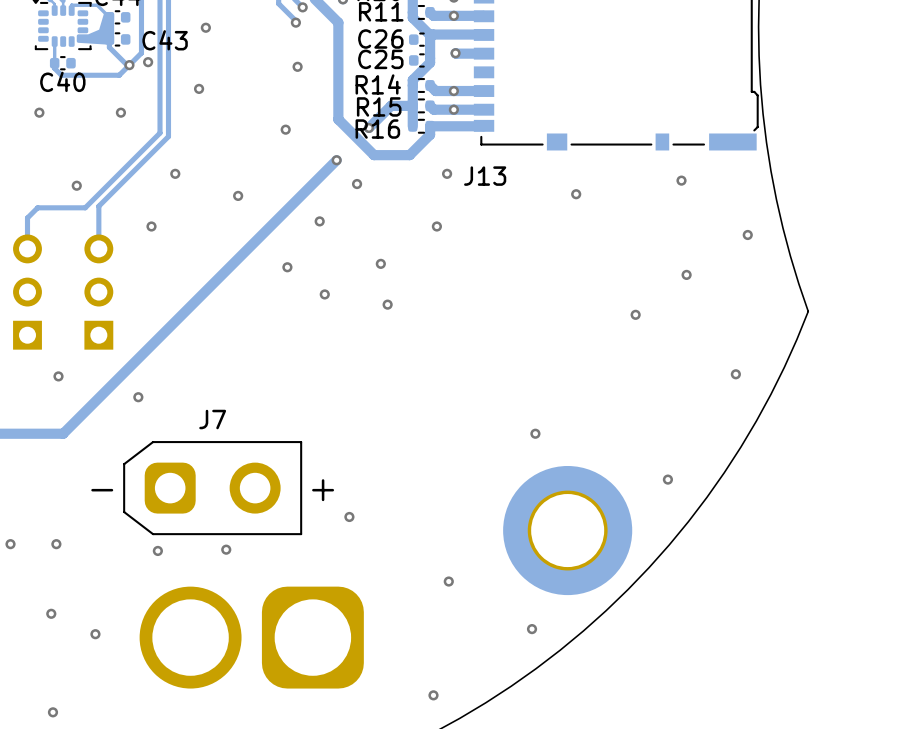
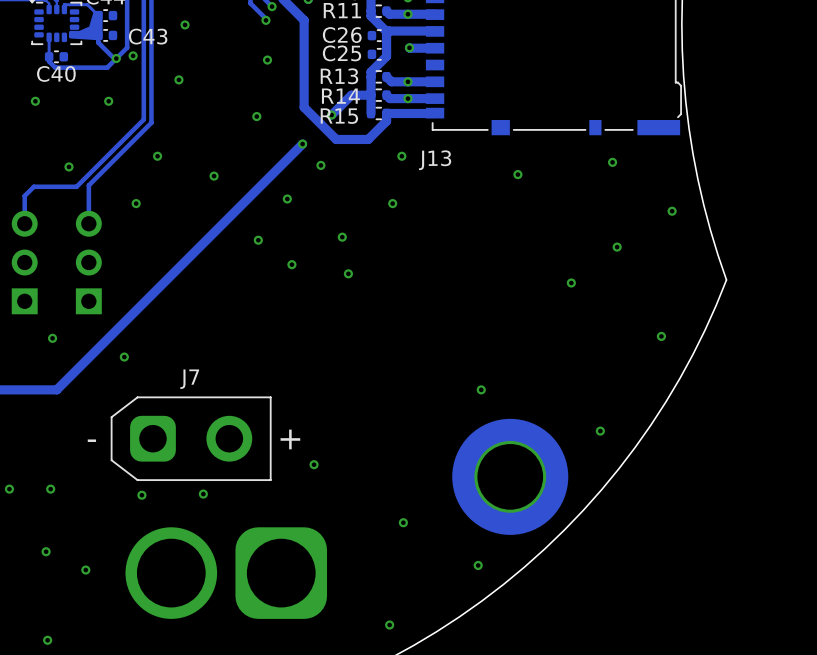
R14 name: R14 (378, 84) -> R13 (339, 76)
R15 name: R15 (379, 106) -> R14 (340, 96)
R16 name: R16 (377, 129) -> R15 (339, 116)

